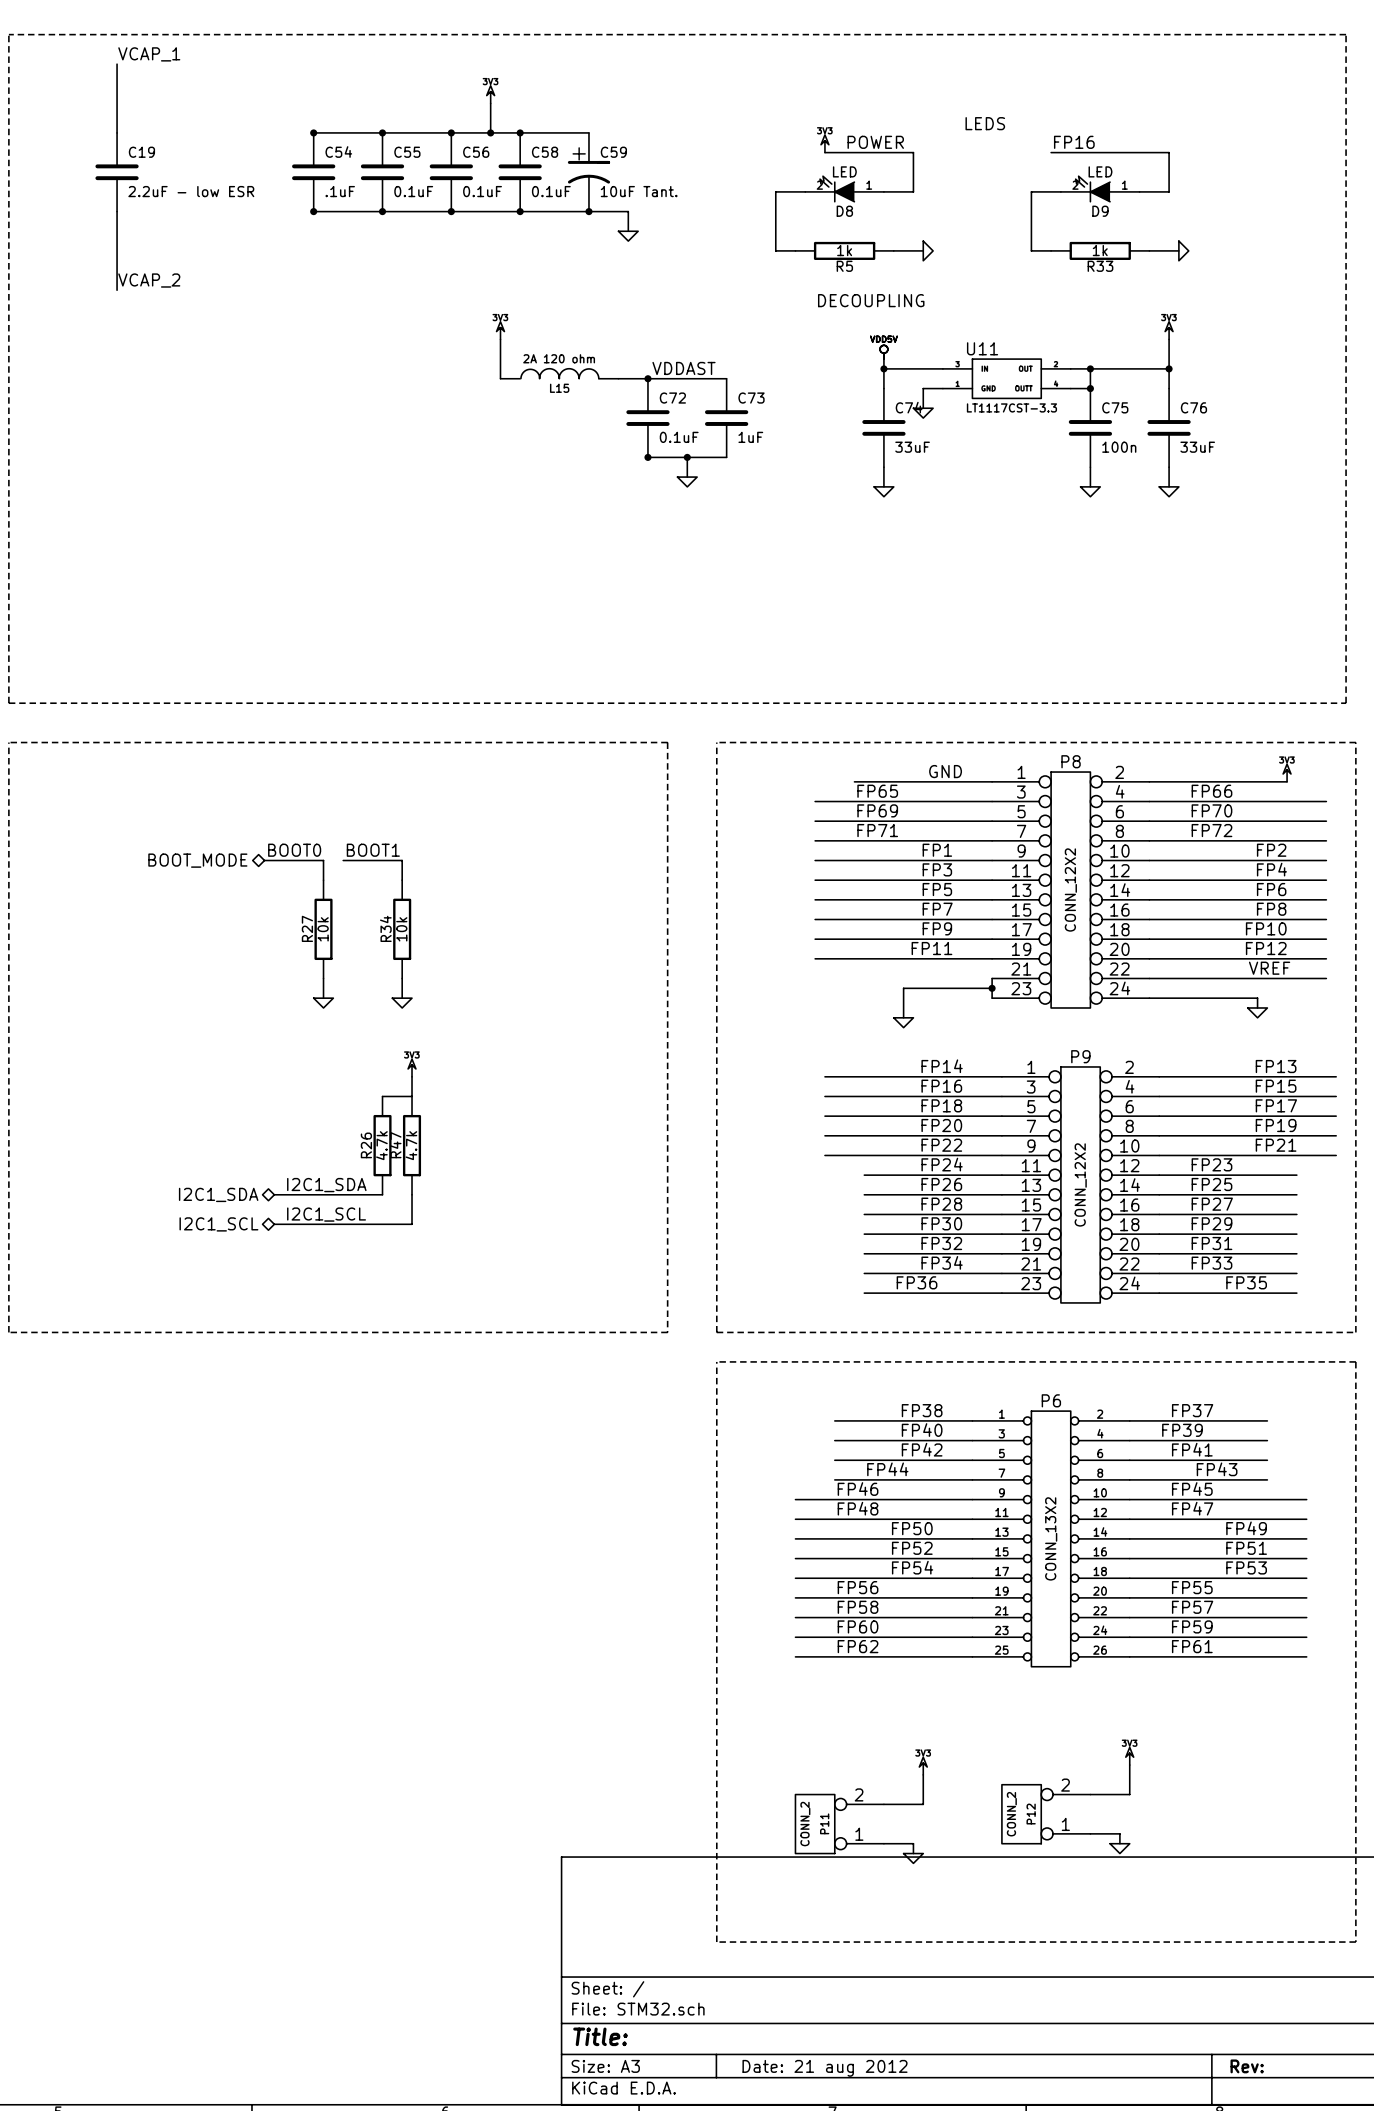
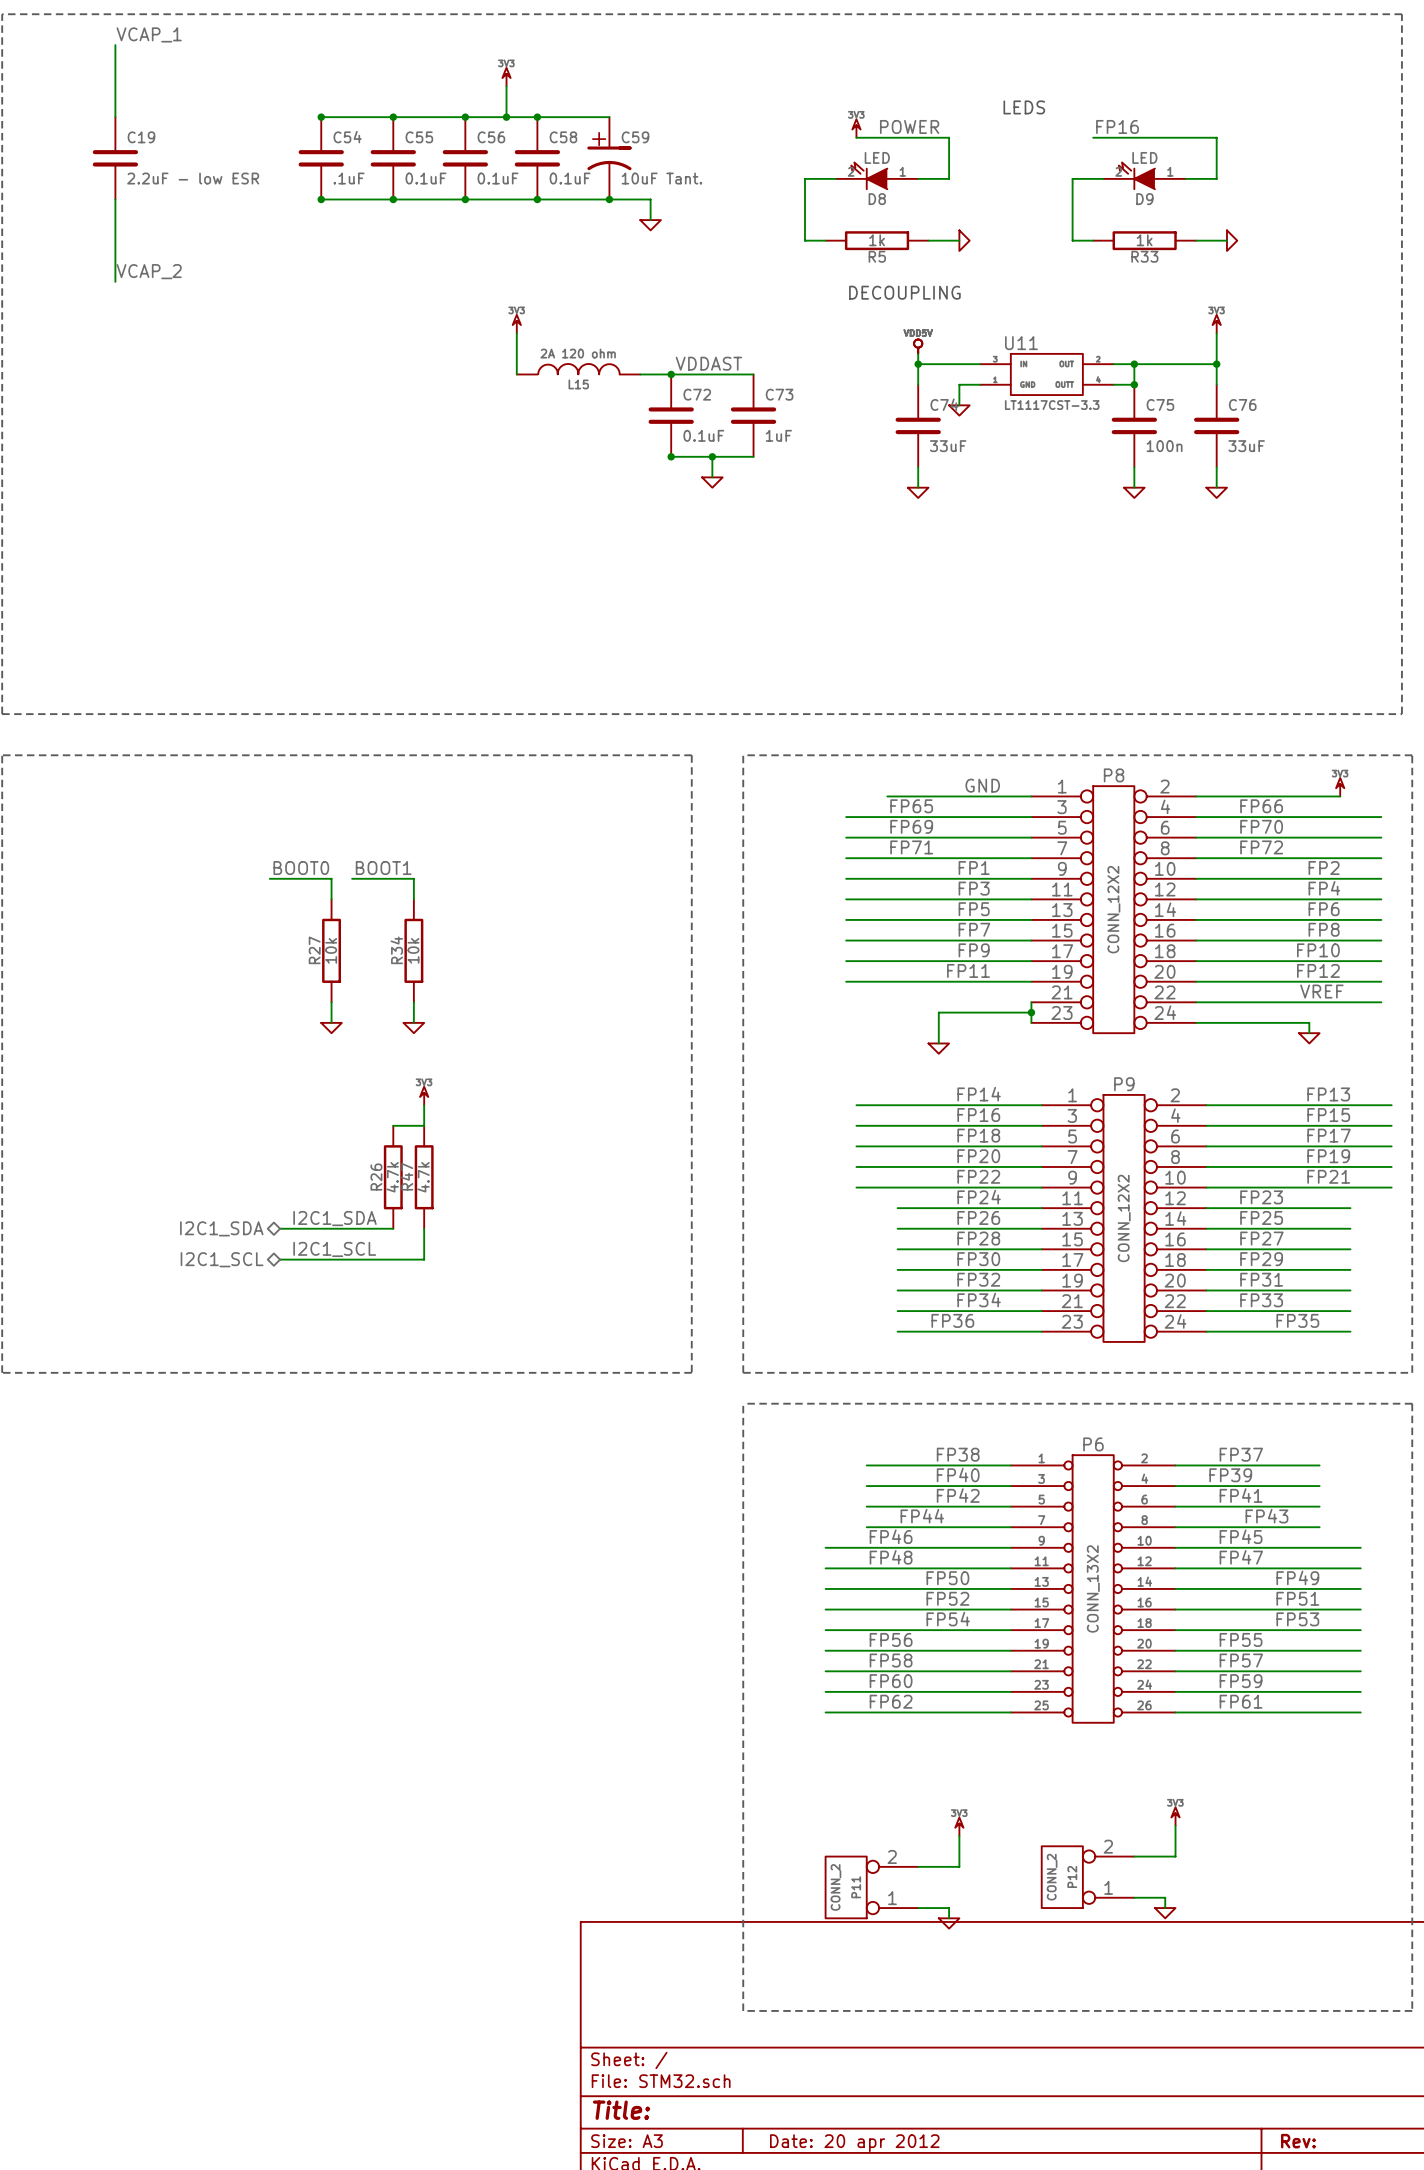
hierarchical label: BOOT_MODE (197, 860) -> none
title block: Date: 21 aug 2012 (825, 2068) -> Date: 20 apr 2012 (854, 2143)

